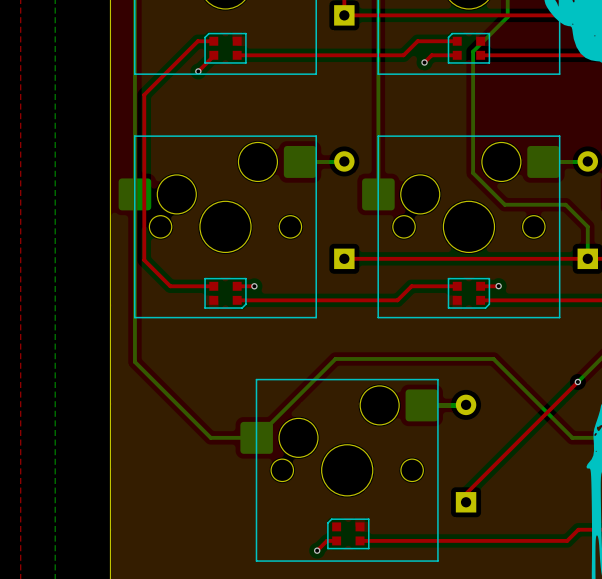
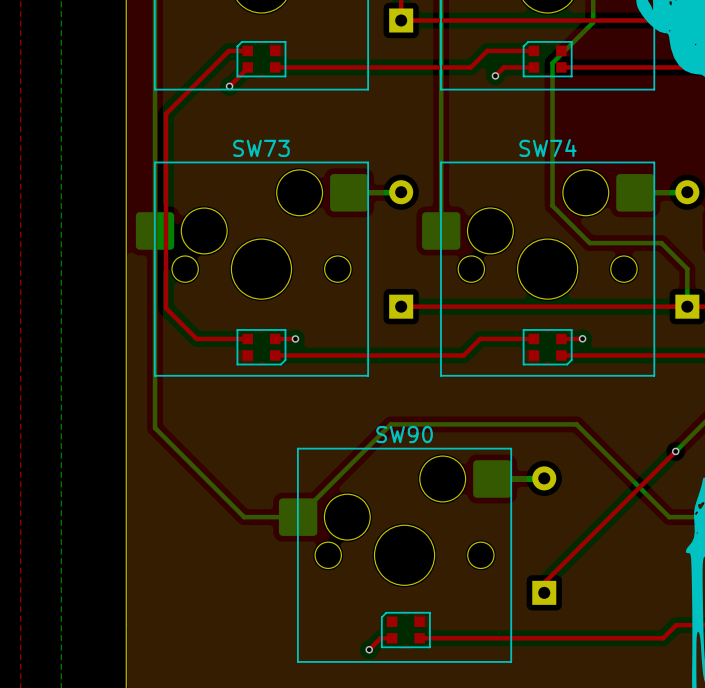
SW74 name: none -> SW74 (548, 148)
SW73 name: none -> SW73 (261, 148)
SW90 name: none -> SW90 (404, 434)

